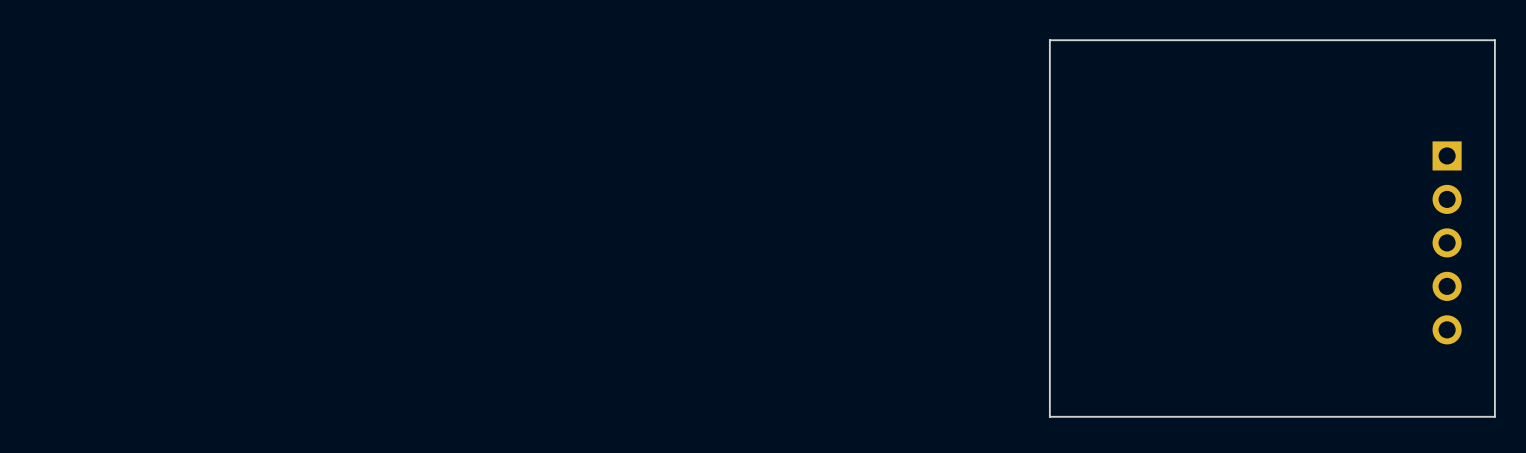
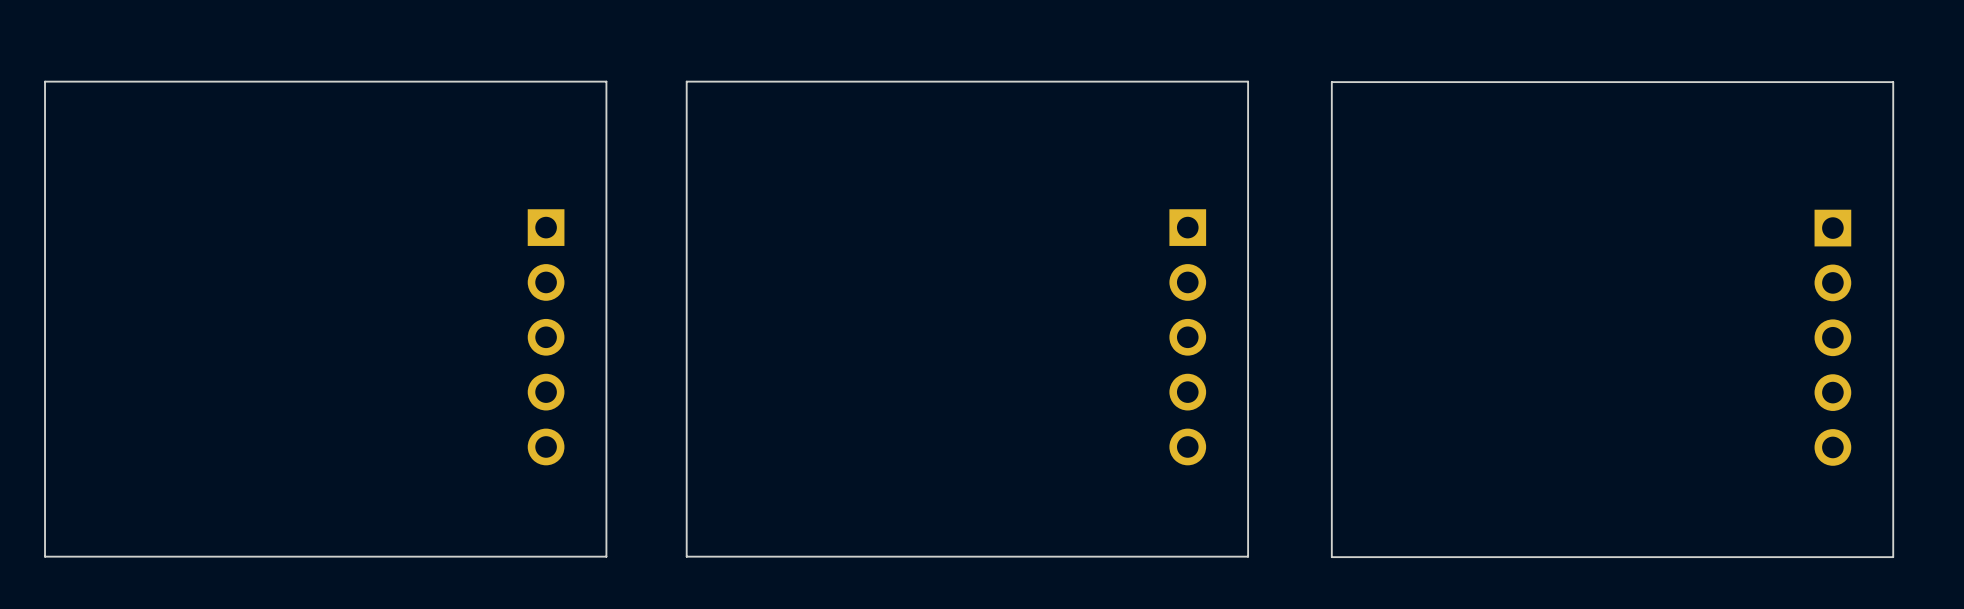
board edge: none -> (606, 81) (45, 81) (45, 556) (606, 556) (606, 81)
board edge: none -> (1248, 81) (686, 81) (686, 556) (1248, 556) (1248, 81)
part: none -> (546, 337)
part: none -> (1187, 337)

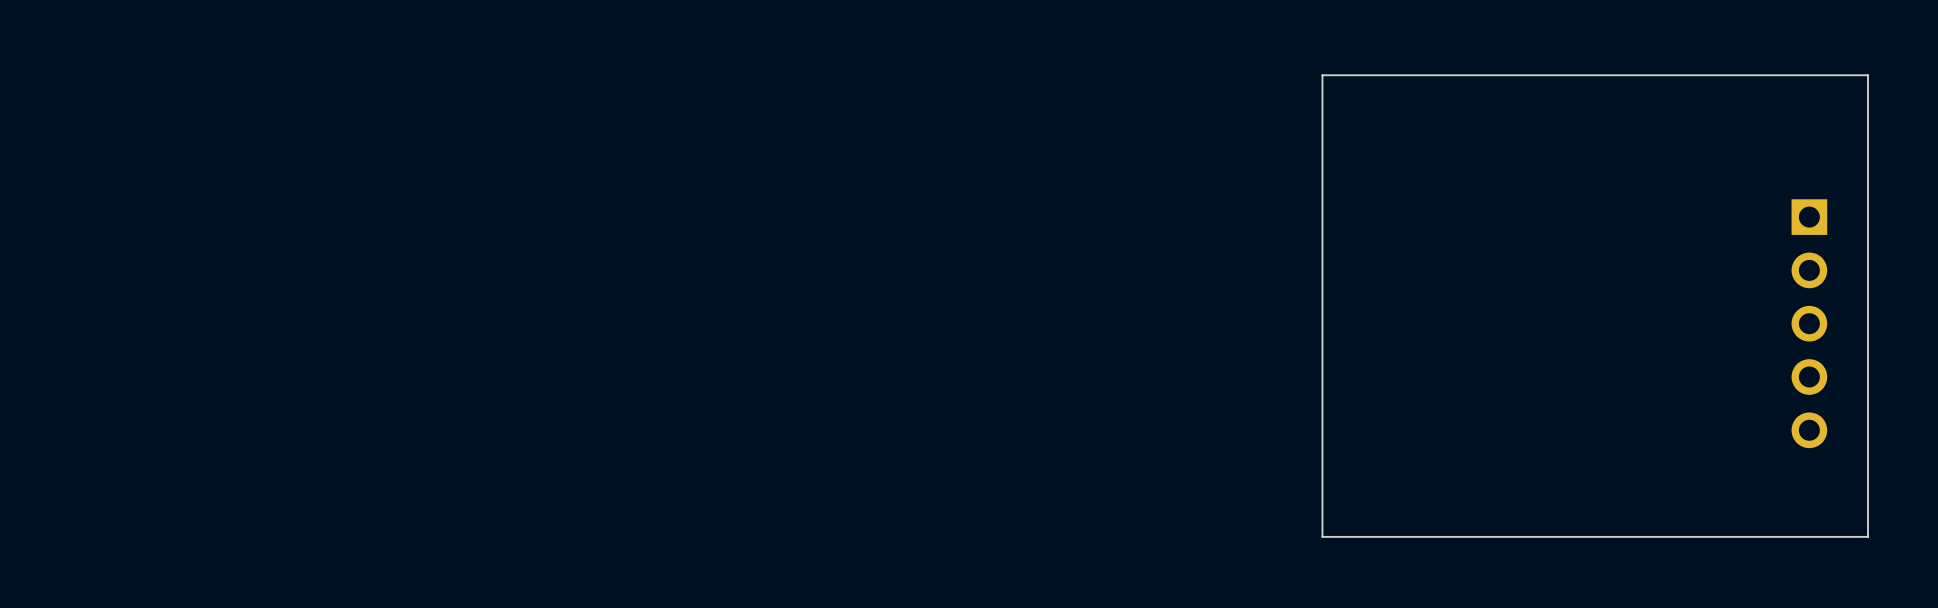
board edge: (606, 81) (45, 81) (45, 556) (606, 556) (606, 81) -> none
board edge: (1248, 81) (686, 81) (686, 556) (1248, 556) (1248, 81) -> none
part: (546, 337) -> none
part: (1187, 337) -> none

